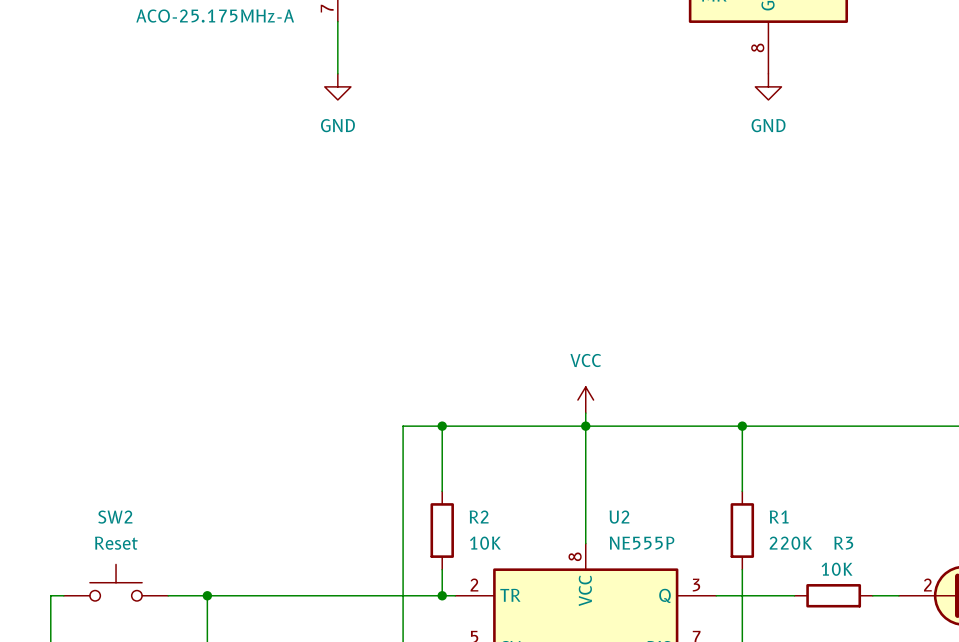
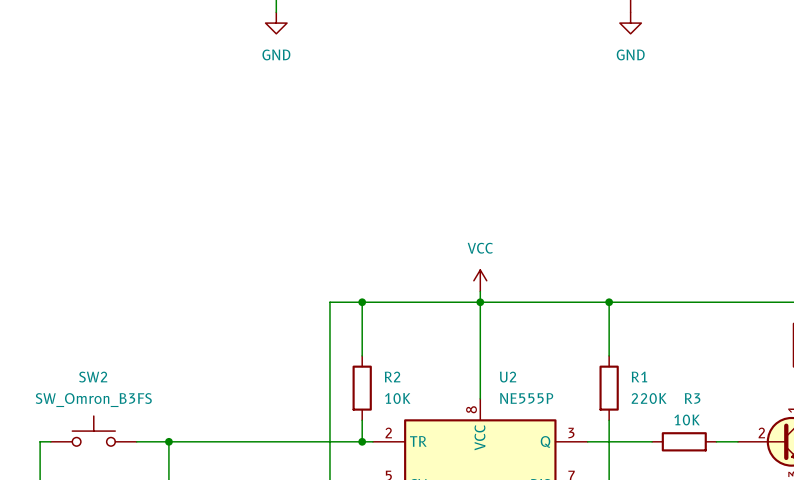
SW2 value: Reset (116, 543) -> SW_Omron_B3FS (93, 400)

